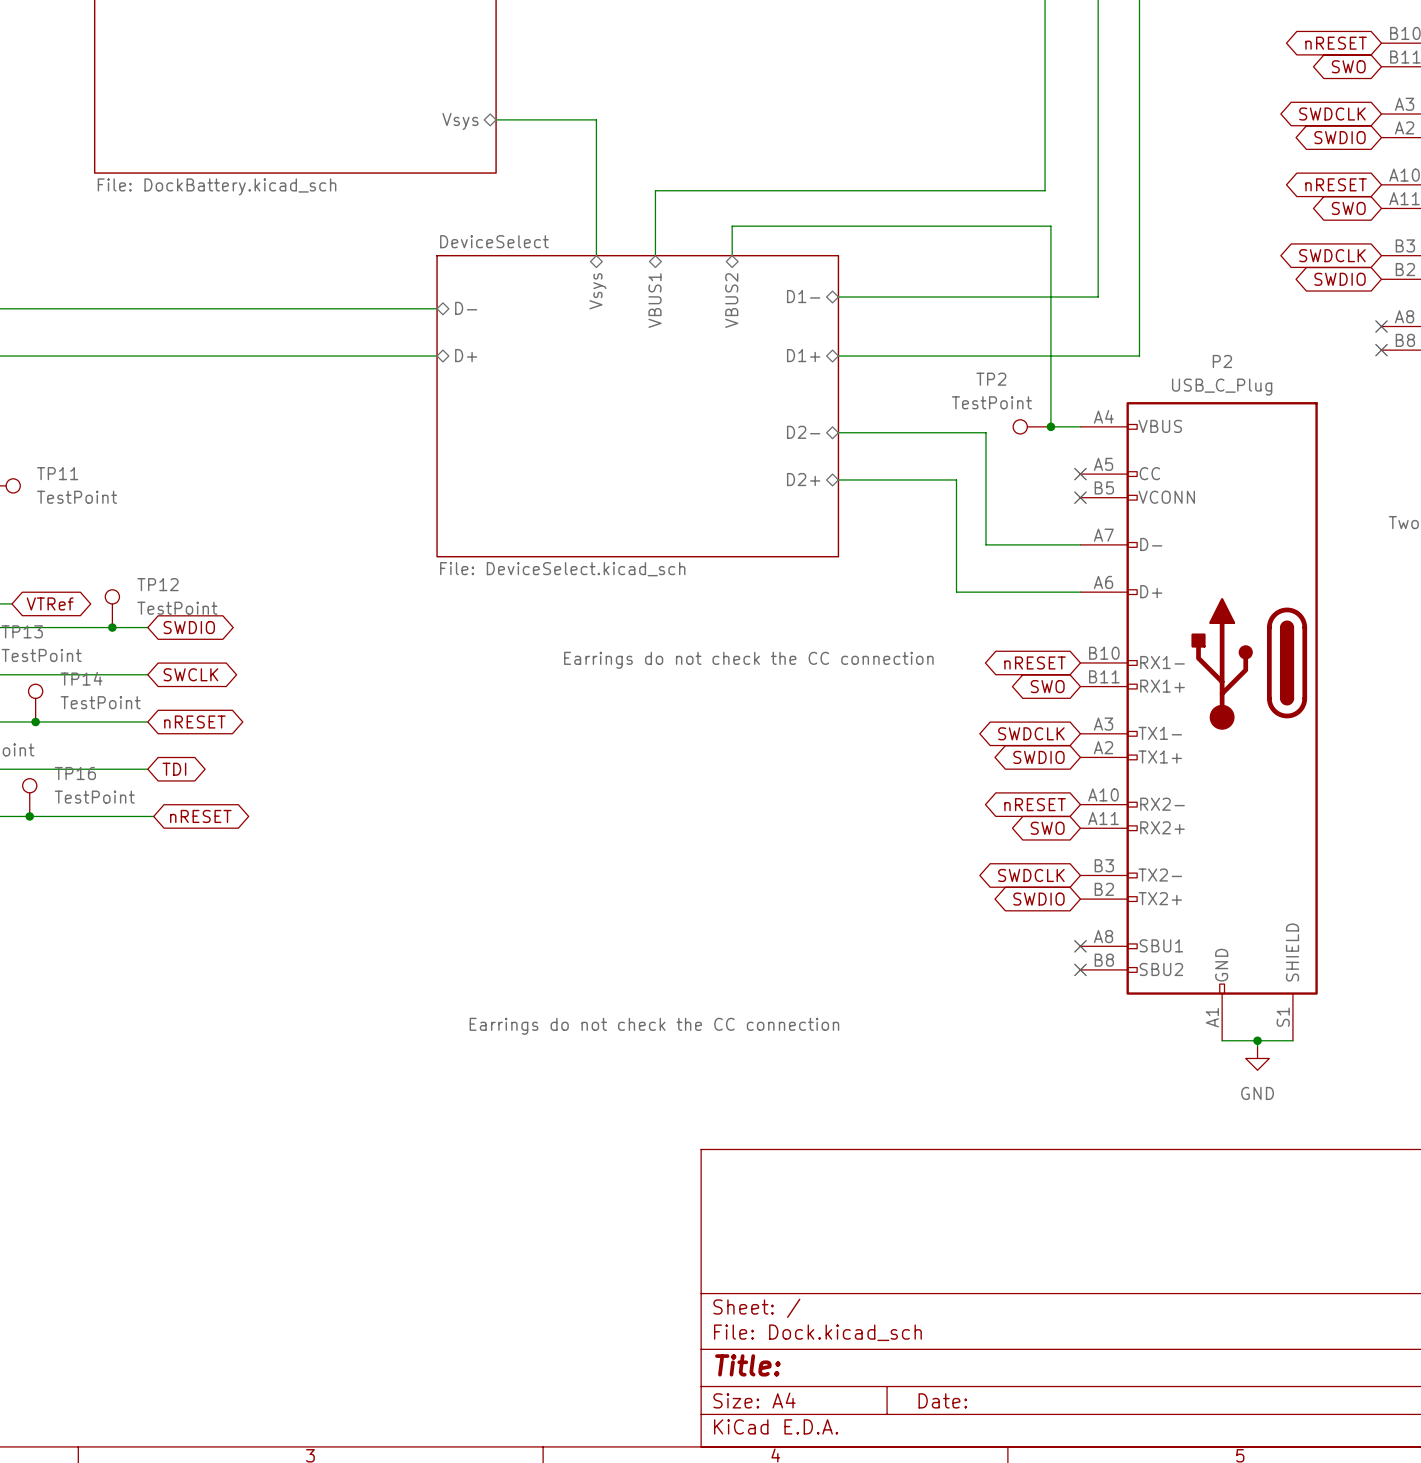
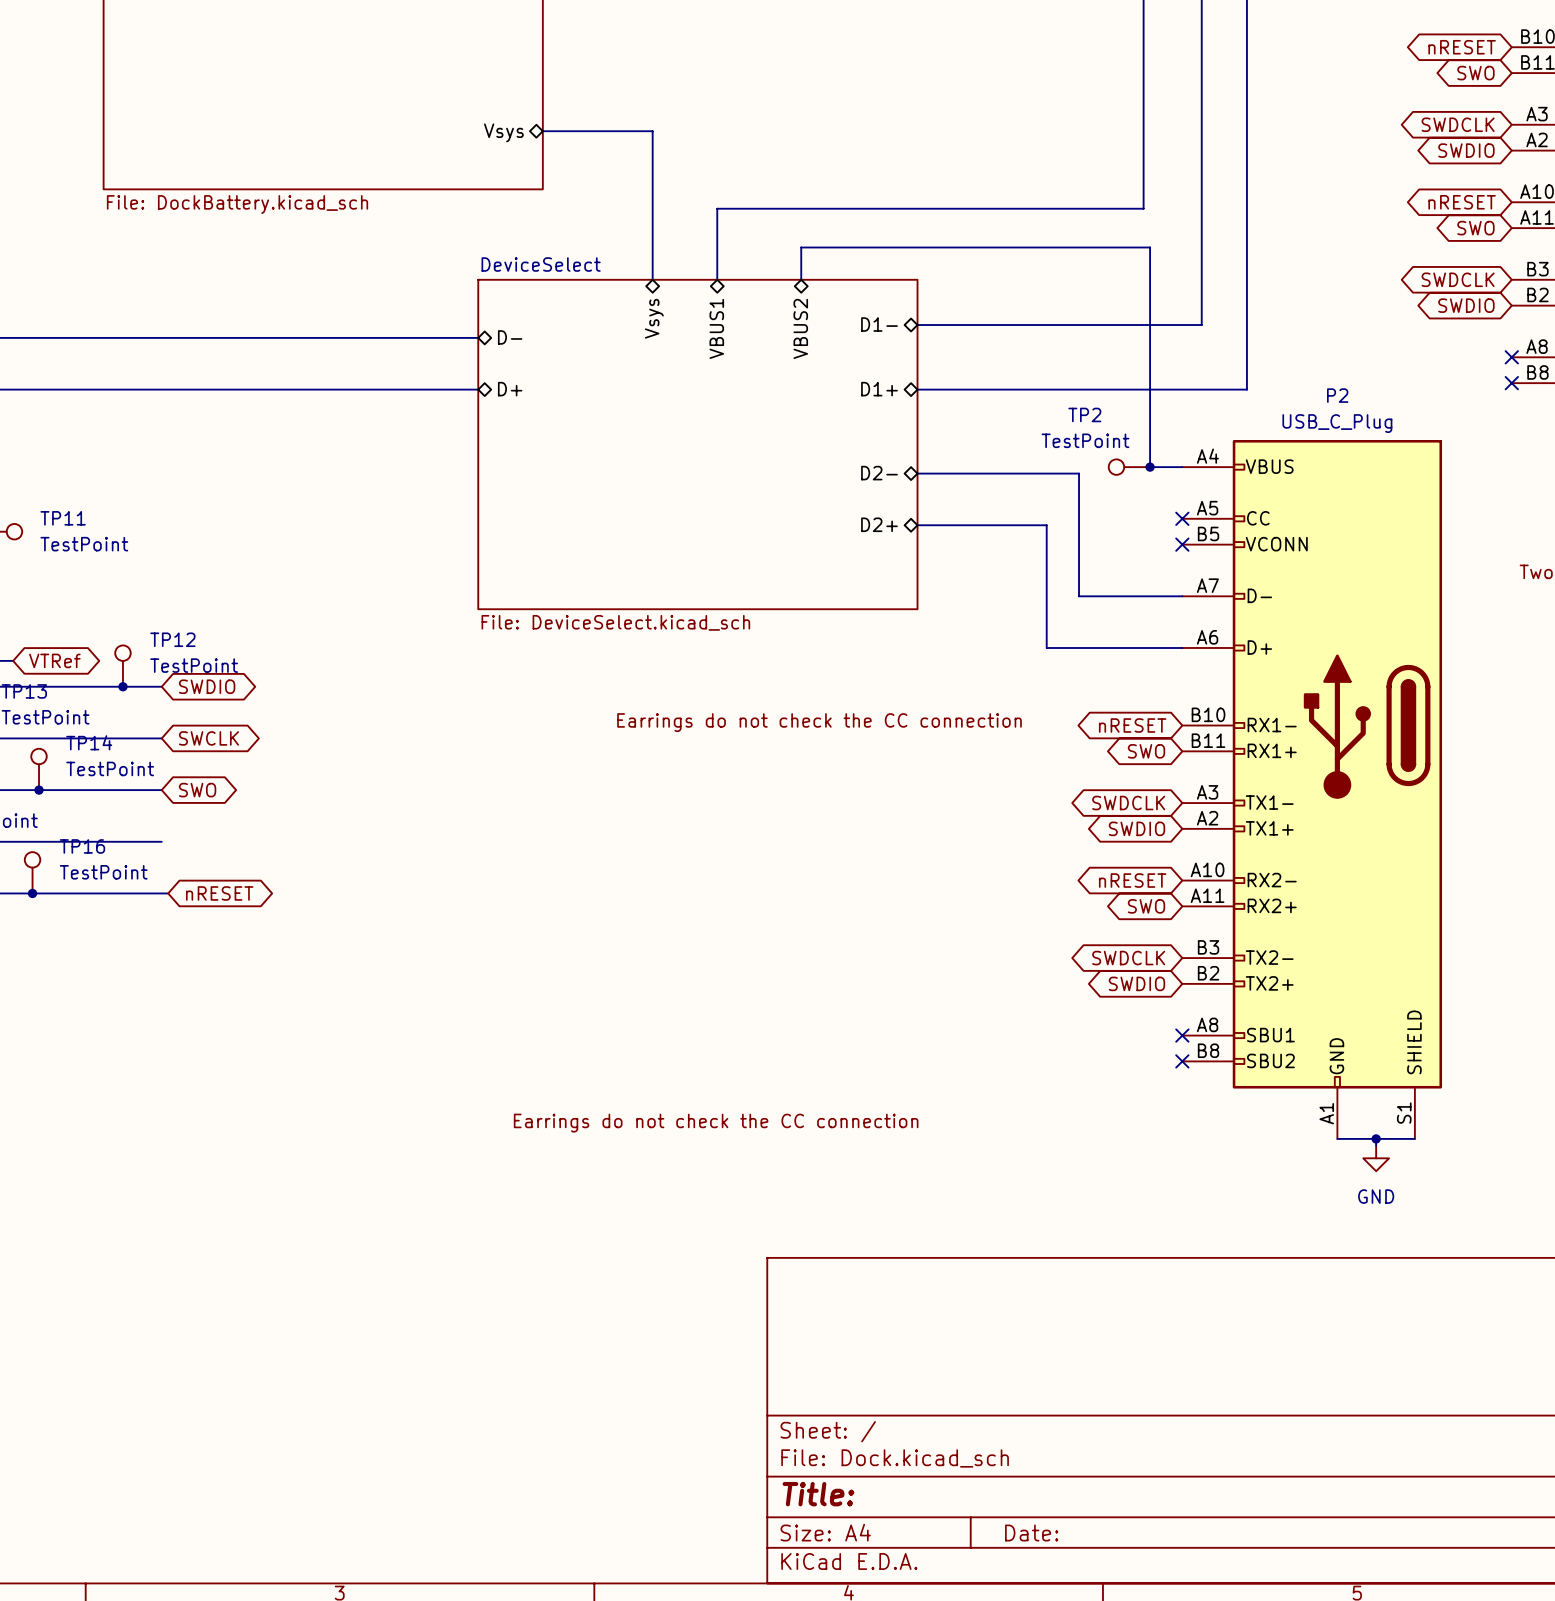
global label: nRESET (194, 722) -> SWO (197, 790)
global label: TDI (174, 769) -> none

